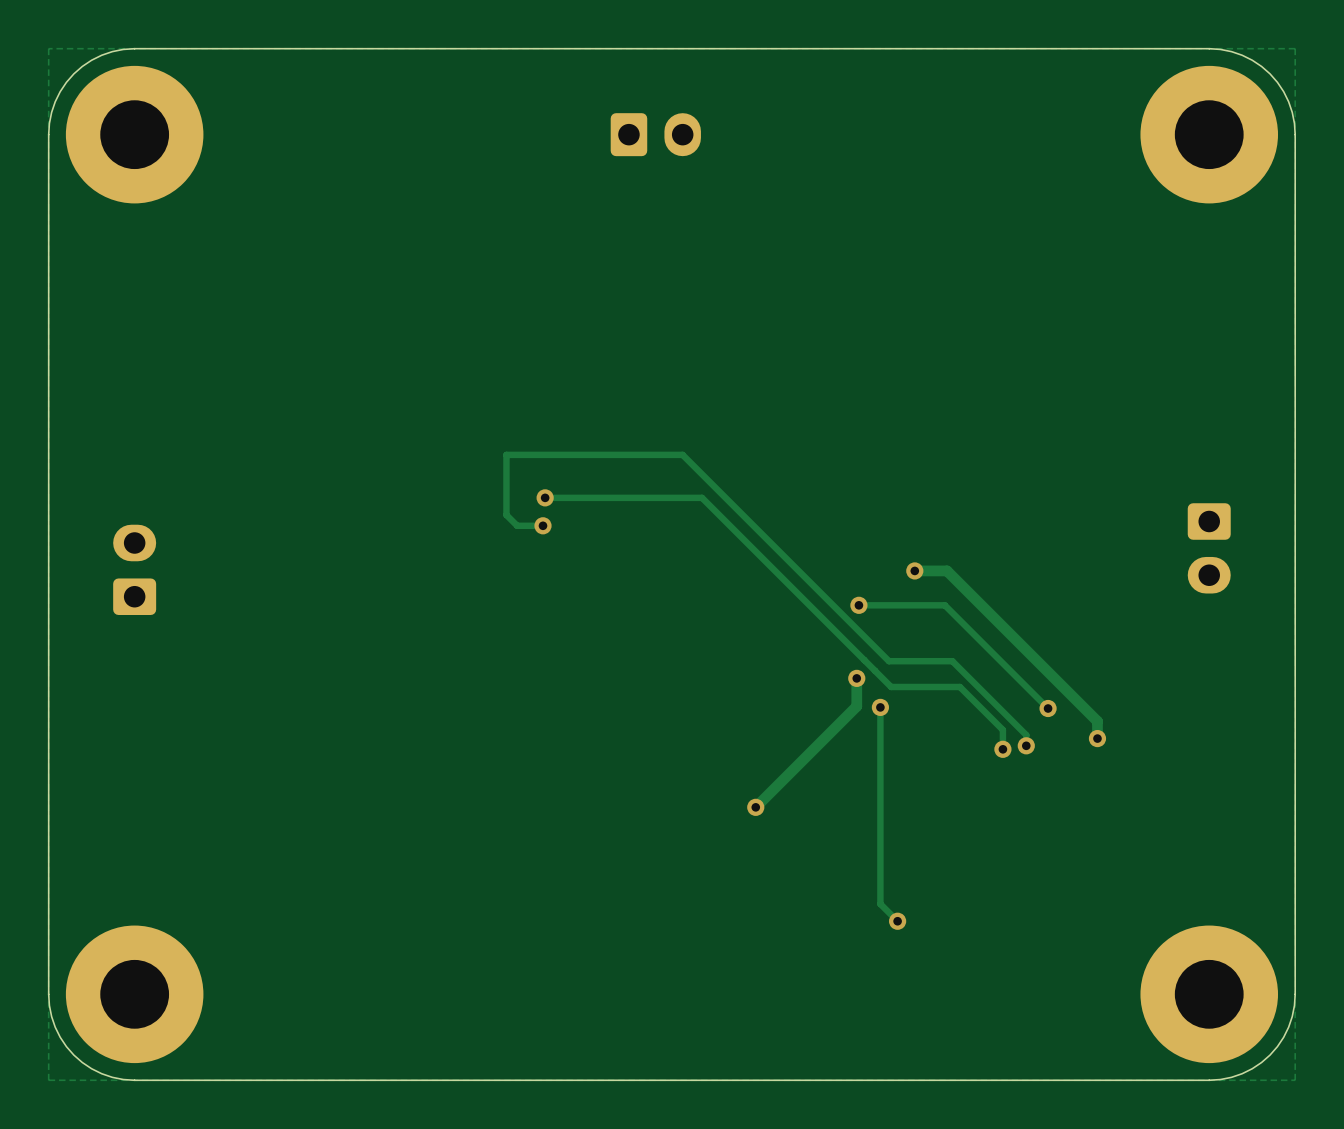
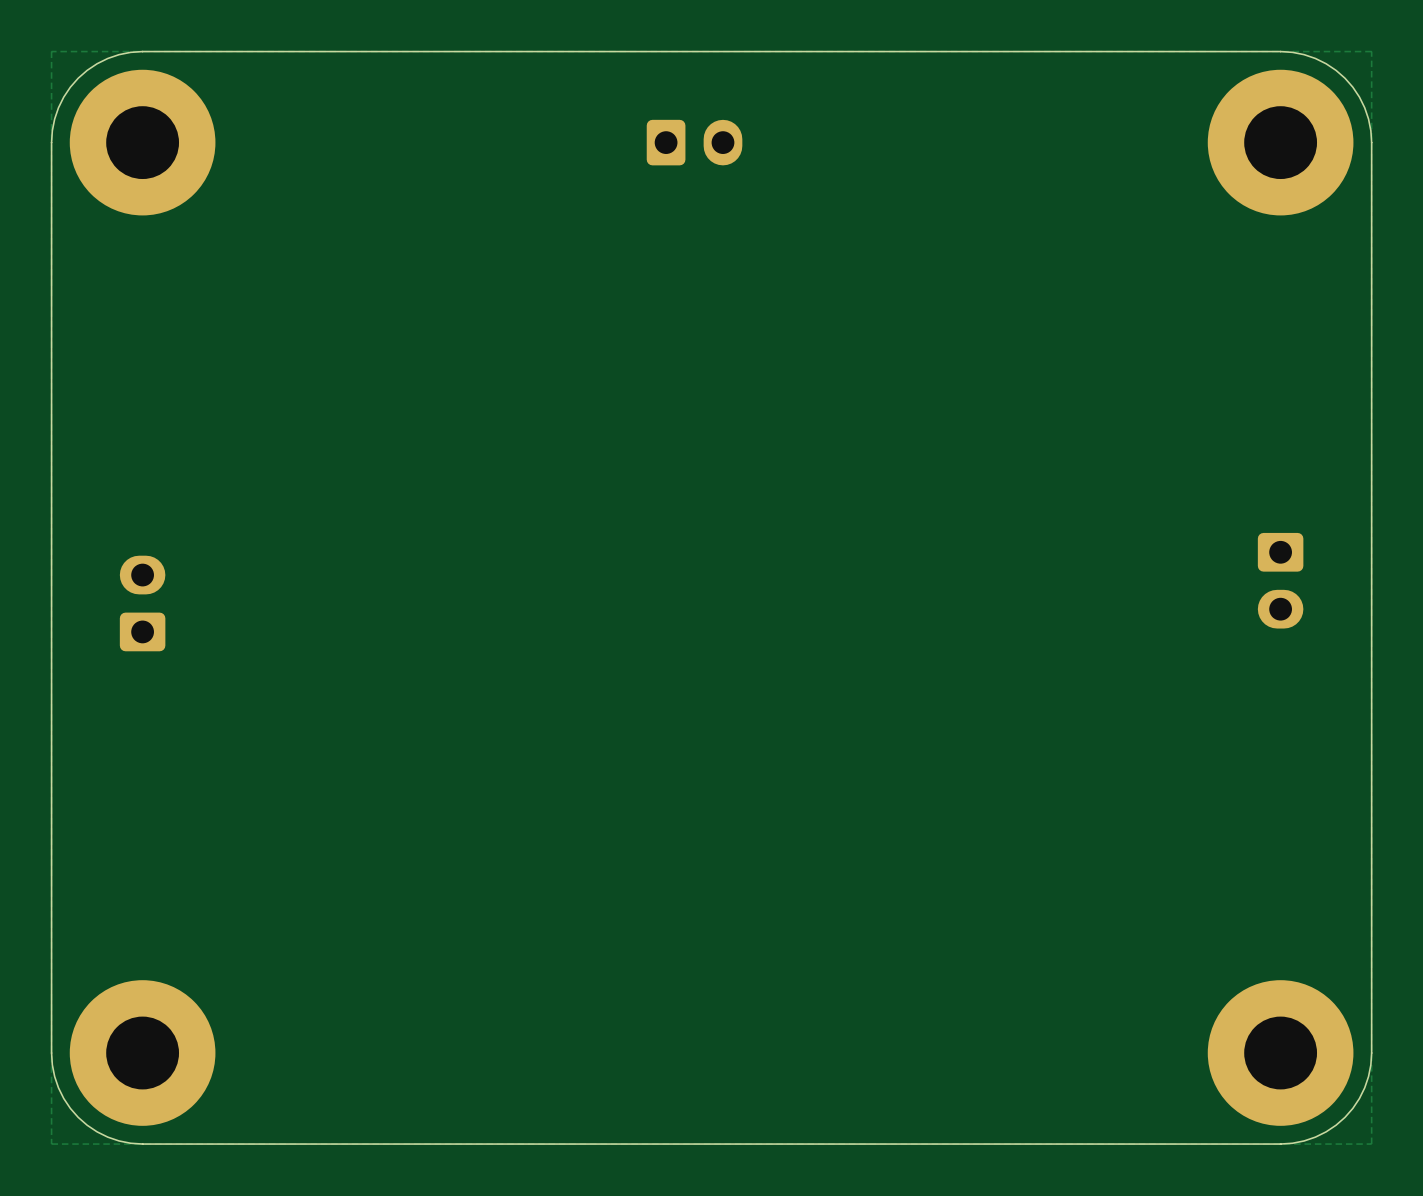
track: (545, 497) (702, 497) (891, 686) (959, 686) (1002, 729) (1002, 749) -> none
via: (545, 497) -> none
track: (542, 525) (517, 525) (506, 515) (506, 454) (682, 454) (888, 661) (952, 661) (1026, 735) (1026, 745) -> none
via: (542, 525) -> none
track: (914, 570) (947, 570) (1097, 721) (1097, 738) -> none
via: (914, 570) -> none
track: (858, 605) (944, 605) (1048, 708) -> none
via: (858, 605) -> none
track: (856, 678) (856, 706) (755, 807) -> none
via: (856, 678) -> none
track: (880, 707) (880, 904) (897, 921) -> none
via: (880, 707) -> none
via: (1048, 708) -> none
via: (1097, 738) -> none
via: (1026, 745) -> none
via: (1002, 749) -> none
via: (755, 807) -> none
via: (897, 921) -> none

